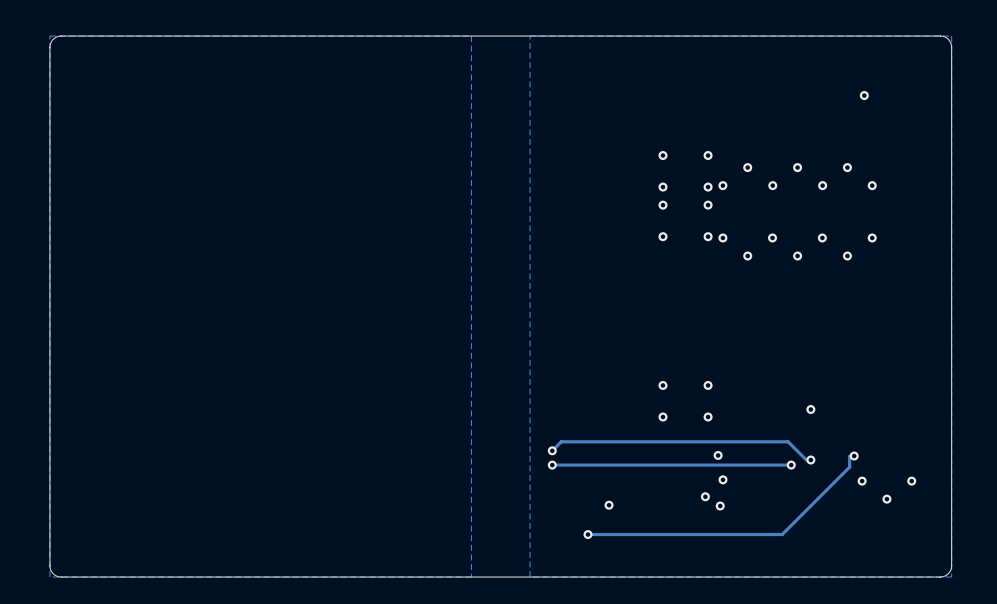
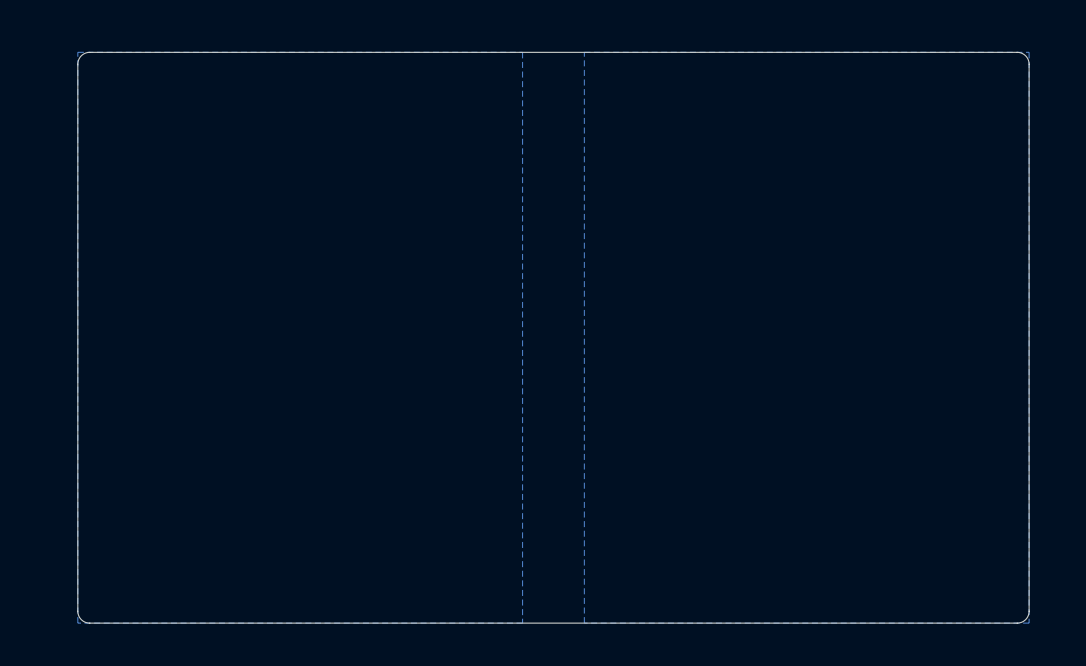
via: (864, 95) -> none
via: (662, 155) -> none
via: (708, 155) -> none
via: (747, 167) -> none
via: (797, 167) -> none
via: (847, 167) -> none
via: (722, 185) -> none
via: (772, 185) -> none
via: (822, 185) -> none
via: (872, 185) -> none
via: (662, 187) -> none
via: (708, 187) -> none
via: (662, 205) -> none
via: (708, 205) -> none
via: (662, 236) -> none
via: (708, 236) -> none
via: (722, 237) -> none
via: (772, 237) -> none
via: (822, 237) -> none
via: (872, 237) -> none
via: (747, 256) -> none
via: (797, 256) -> none
via: (847, 256) -> none
via: (662, 385) -> none
via: (708, 385) -> none
via: (810, 409) -> none
via: (662, 417) -> none
via: (708, 417) -> none
track: (552, 450) (561, 441) (788, 441) (806, 460) -> none
via: (552, 450) -> none
via: (718, 455) -> none
track: (849, 456) (849, 467) (782, 534) (588, 534) -> none
via: (854, 456) -> none
via: (810, 460) -> none
via: (552, 465) -> none
track: (791, 465) (552, 465) -> none
via: (791, 465) -> none
via: (723, 479) -> none
via: (862, 481) -> none
via: (911, 481) -> none
via: (705, 496) -> none
via: (886, 499) -> none
via: (609, 505) -> none
via: (720, 505) -> none
via: (588, 534) -> none

